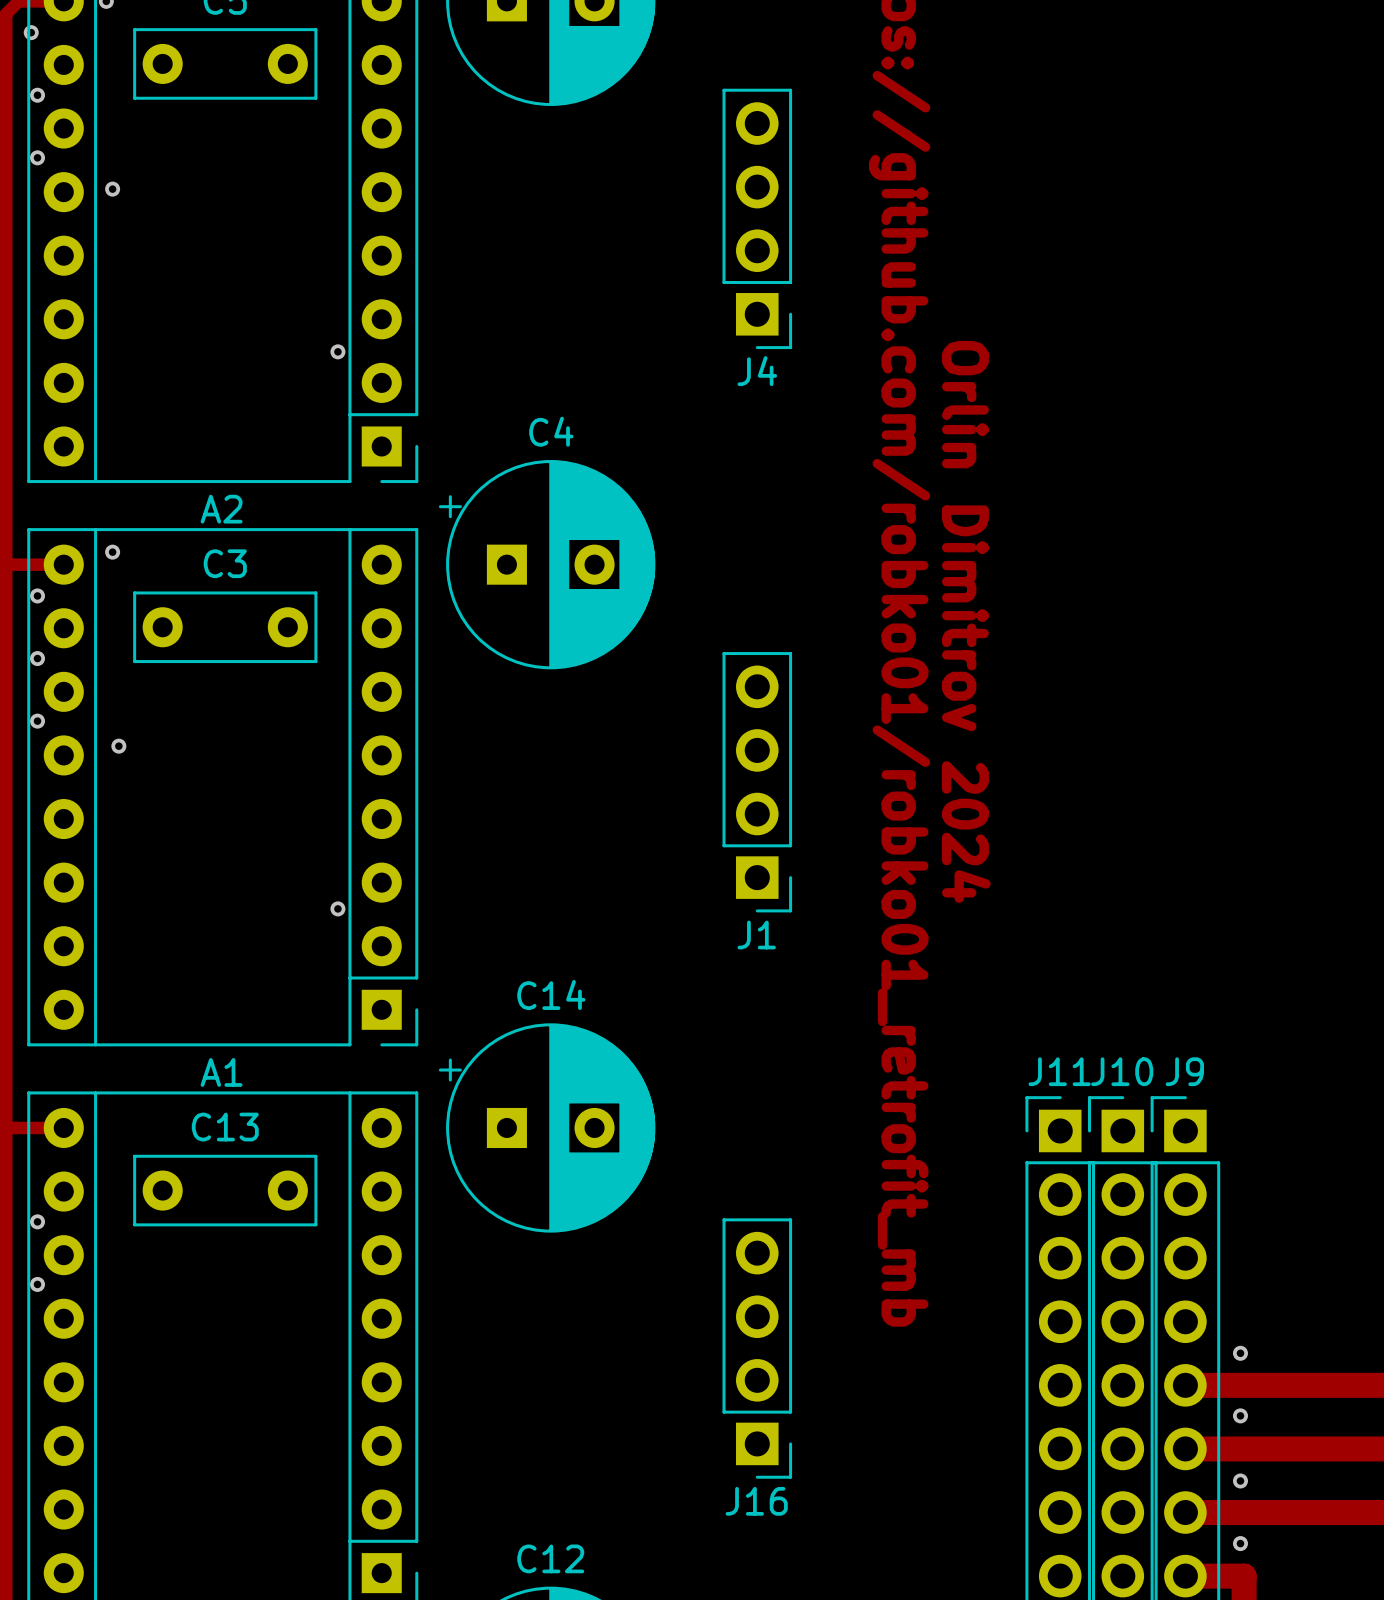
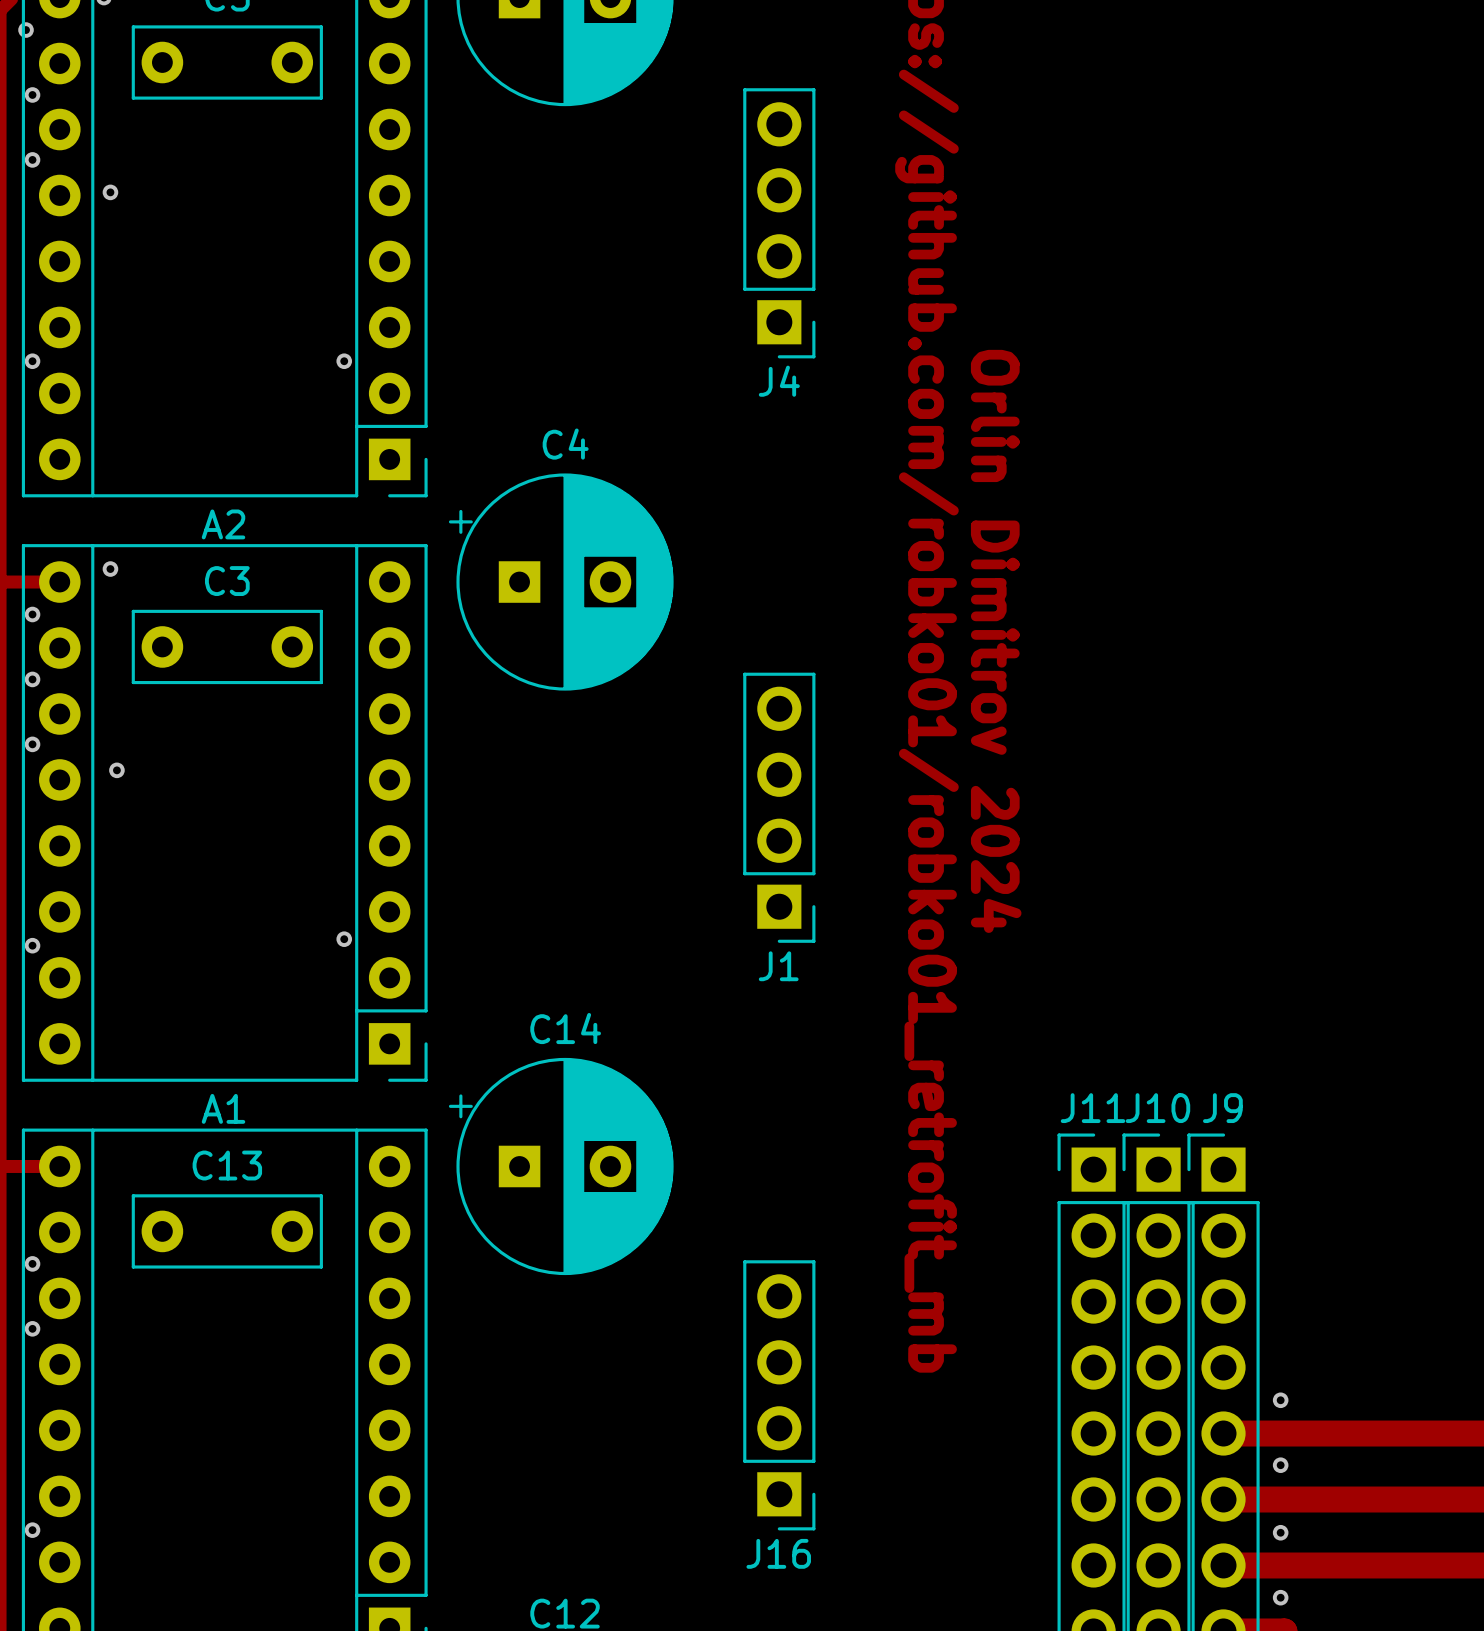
via: none -> (32, 361)
via: none -> (32, 945)
via: none -> (32, 1530)

